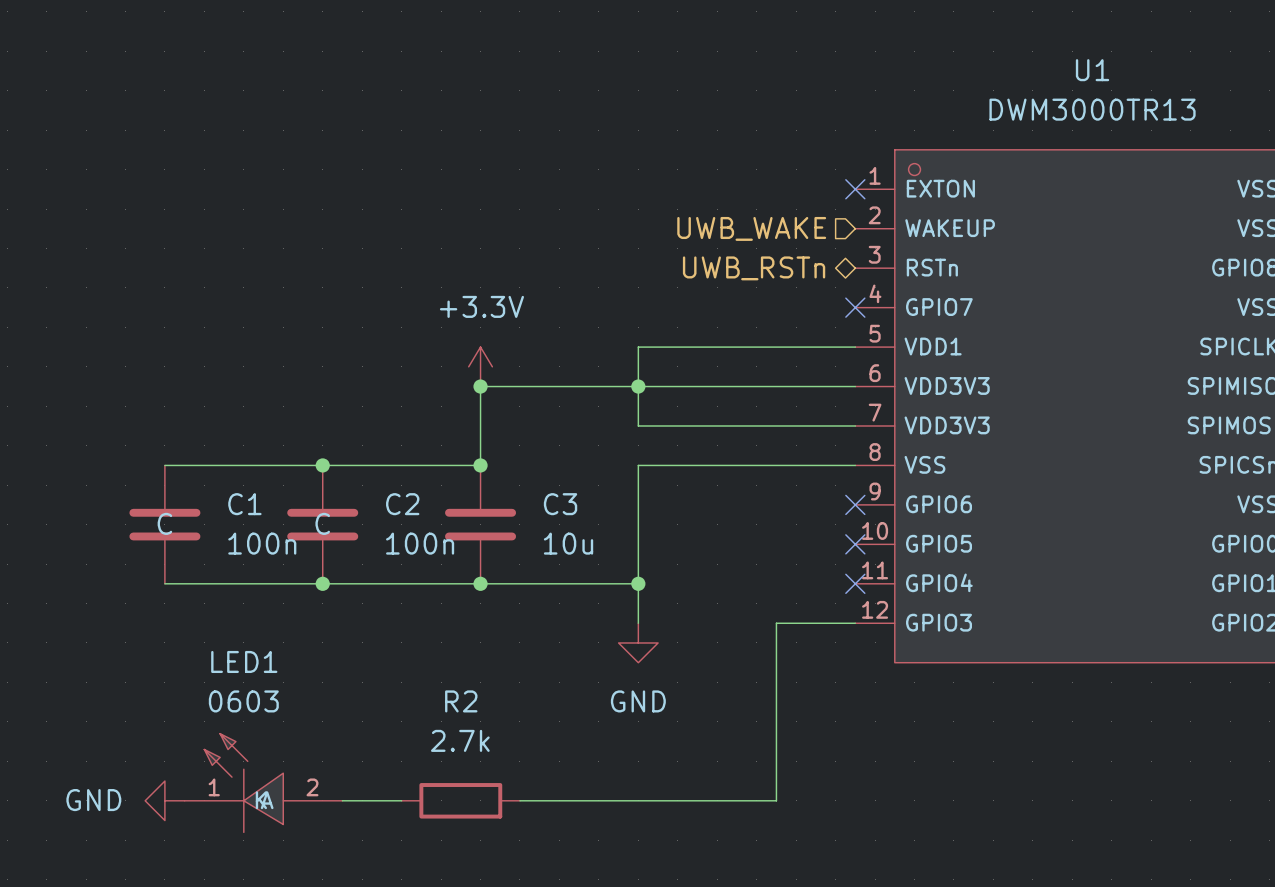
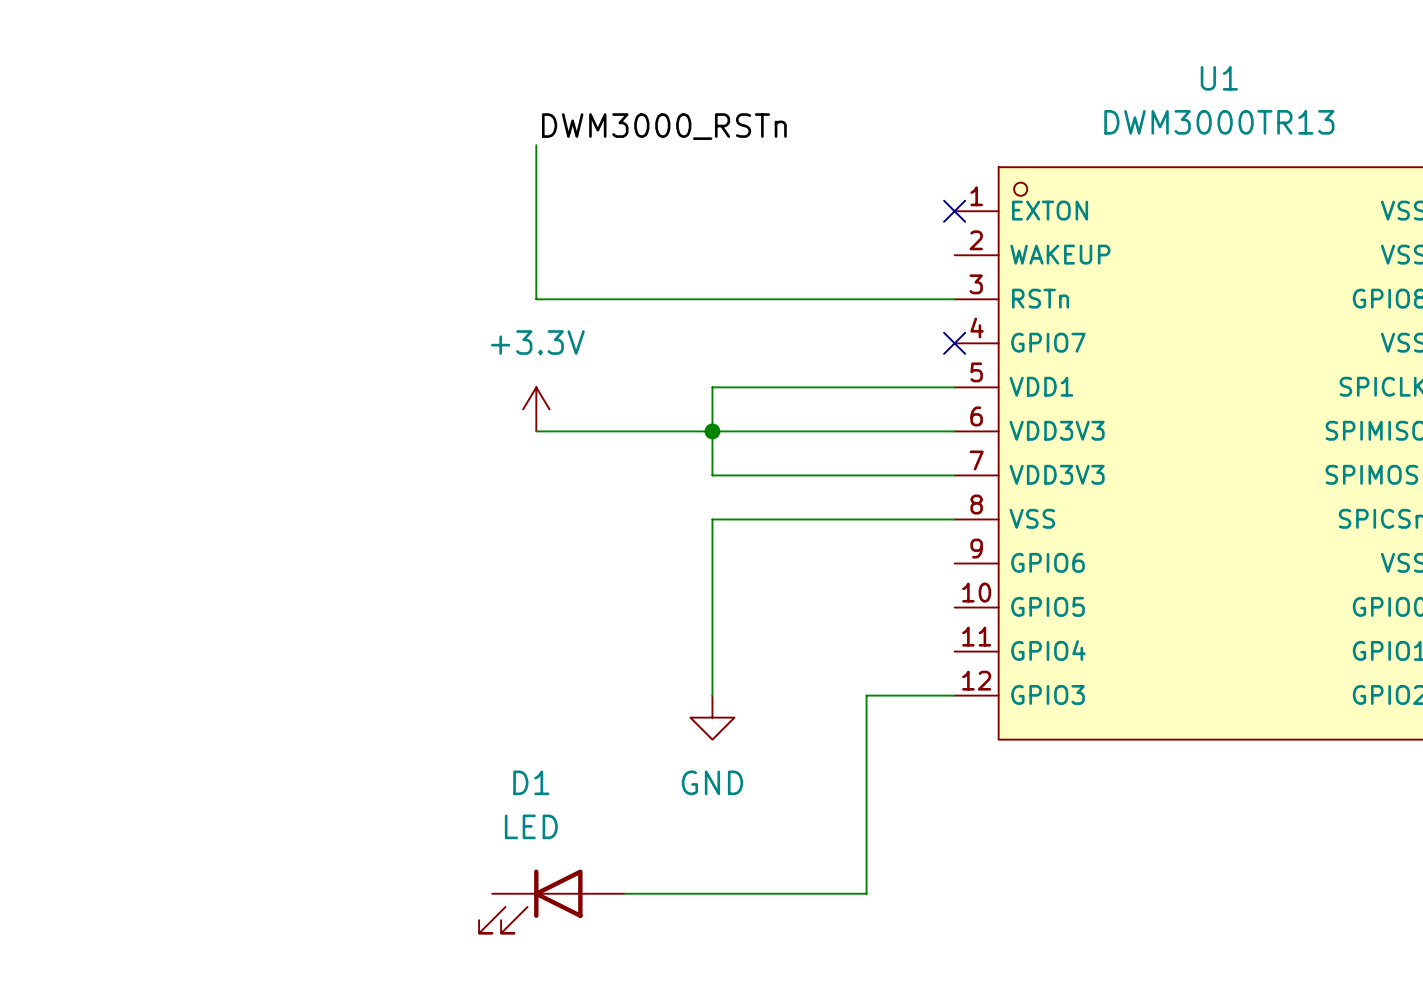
label: none -> DWM3000_RSTn (664, 126)
wire: none -> (536, 145) (536, 299) (954, 299)
hierarchical label: UWB_WAKE (751, 228) -> none
hierarchical label: UWB_RSTn (754, 268) -> none
wire: (480, 386) (480, 465) (164, 465) -> none
junction: (480, 386) -> none
junction: (322, 465) -> none
junction: (480, 465) -> none
no-connect mark: (855, 504) -> none
C1: 100n (164, 524) -> none
C2: 100n (322, 524) -> none
C3: 10u (480, 524) -> none
no-connect mark: (855, 544) -> none
wire: (164, 583) (638, 583) -> none
junction: (322, 583) -> none
junction: (480, 583) -> none
junction: (638, 583) -> none
no-connect mark: (855, 583) -> none
LED1: 0603 (263, 783) -> none
power symbol: GND (164, 800) -> none
wire: (342, 800) (401, 800) -> none
R2: 2.7k (460, 800) -> none
D1: none -> LED (551, 901)

